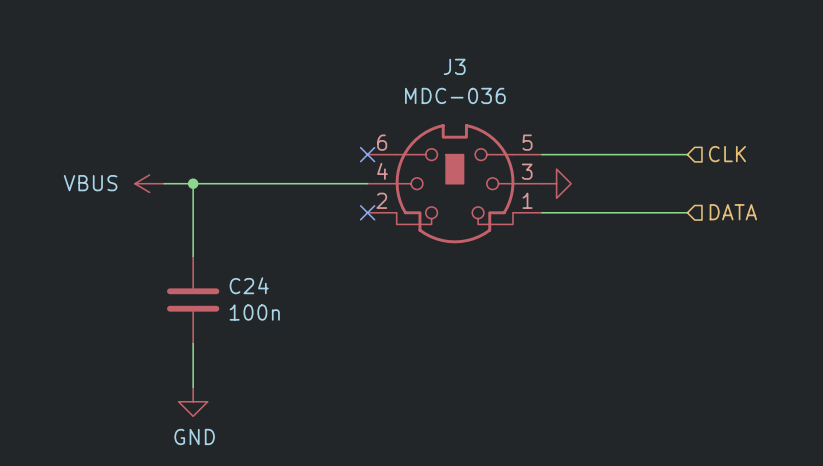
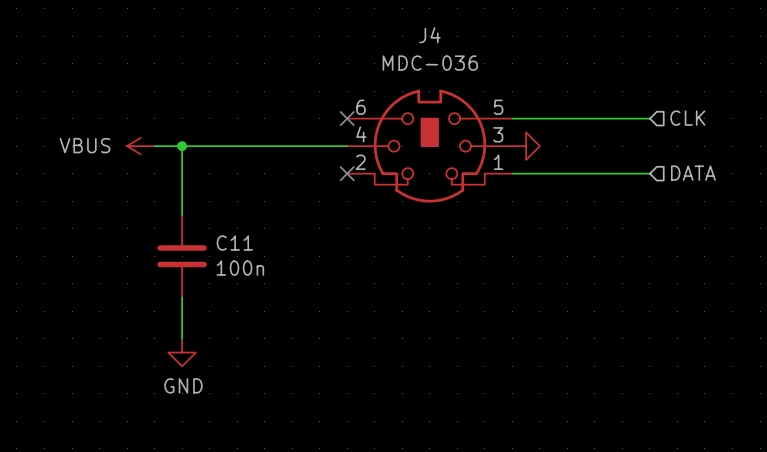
J3 name: J3 (454, 66) -> J4 (429, 35)
C24 name: C24 (249, 285) -> C11 (234, 243)

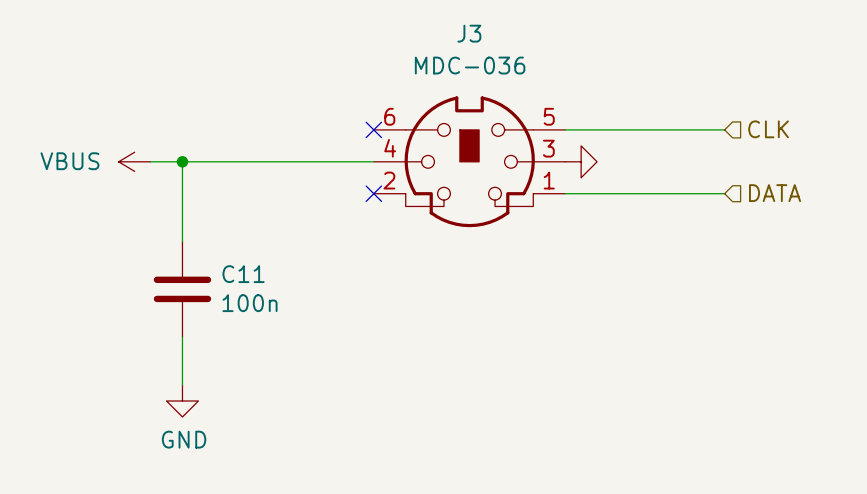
J4 name: J4 (429, 35) -> J3 (469, 33)

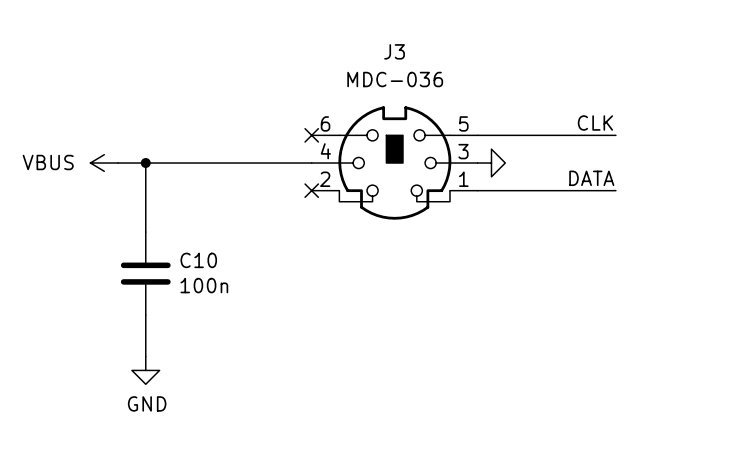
label: none -> CLK (595, 123)
hierarchical label: CLK (768, 129) -> none
label: none -> DATA (591, 178)
hierarchical label: DATA (775, 193) -> none
C11 name: C11 (243, 274) -> C10 (198, 260)

